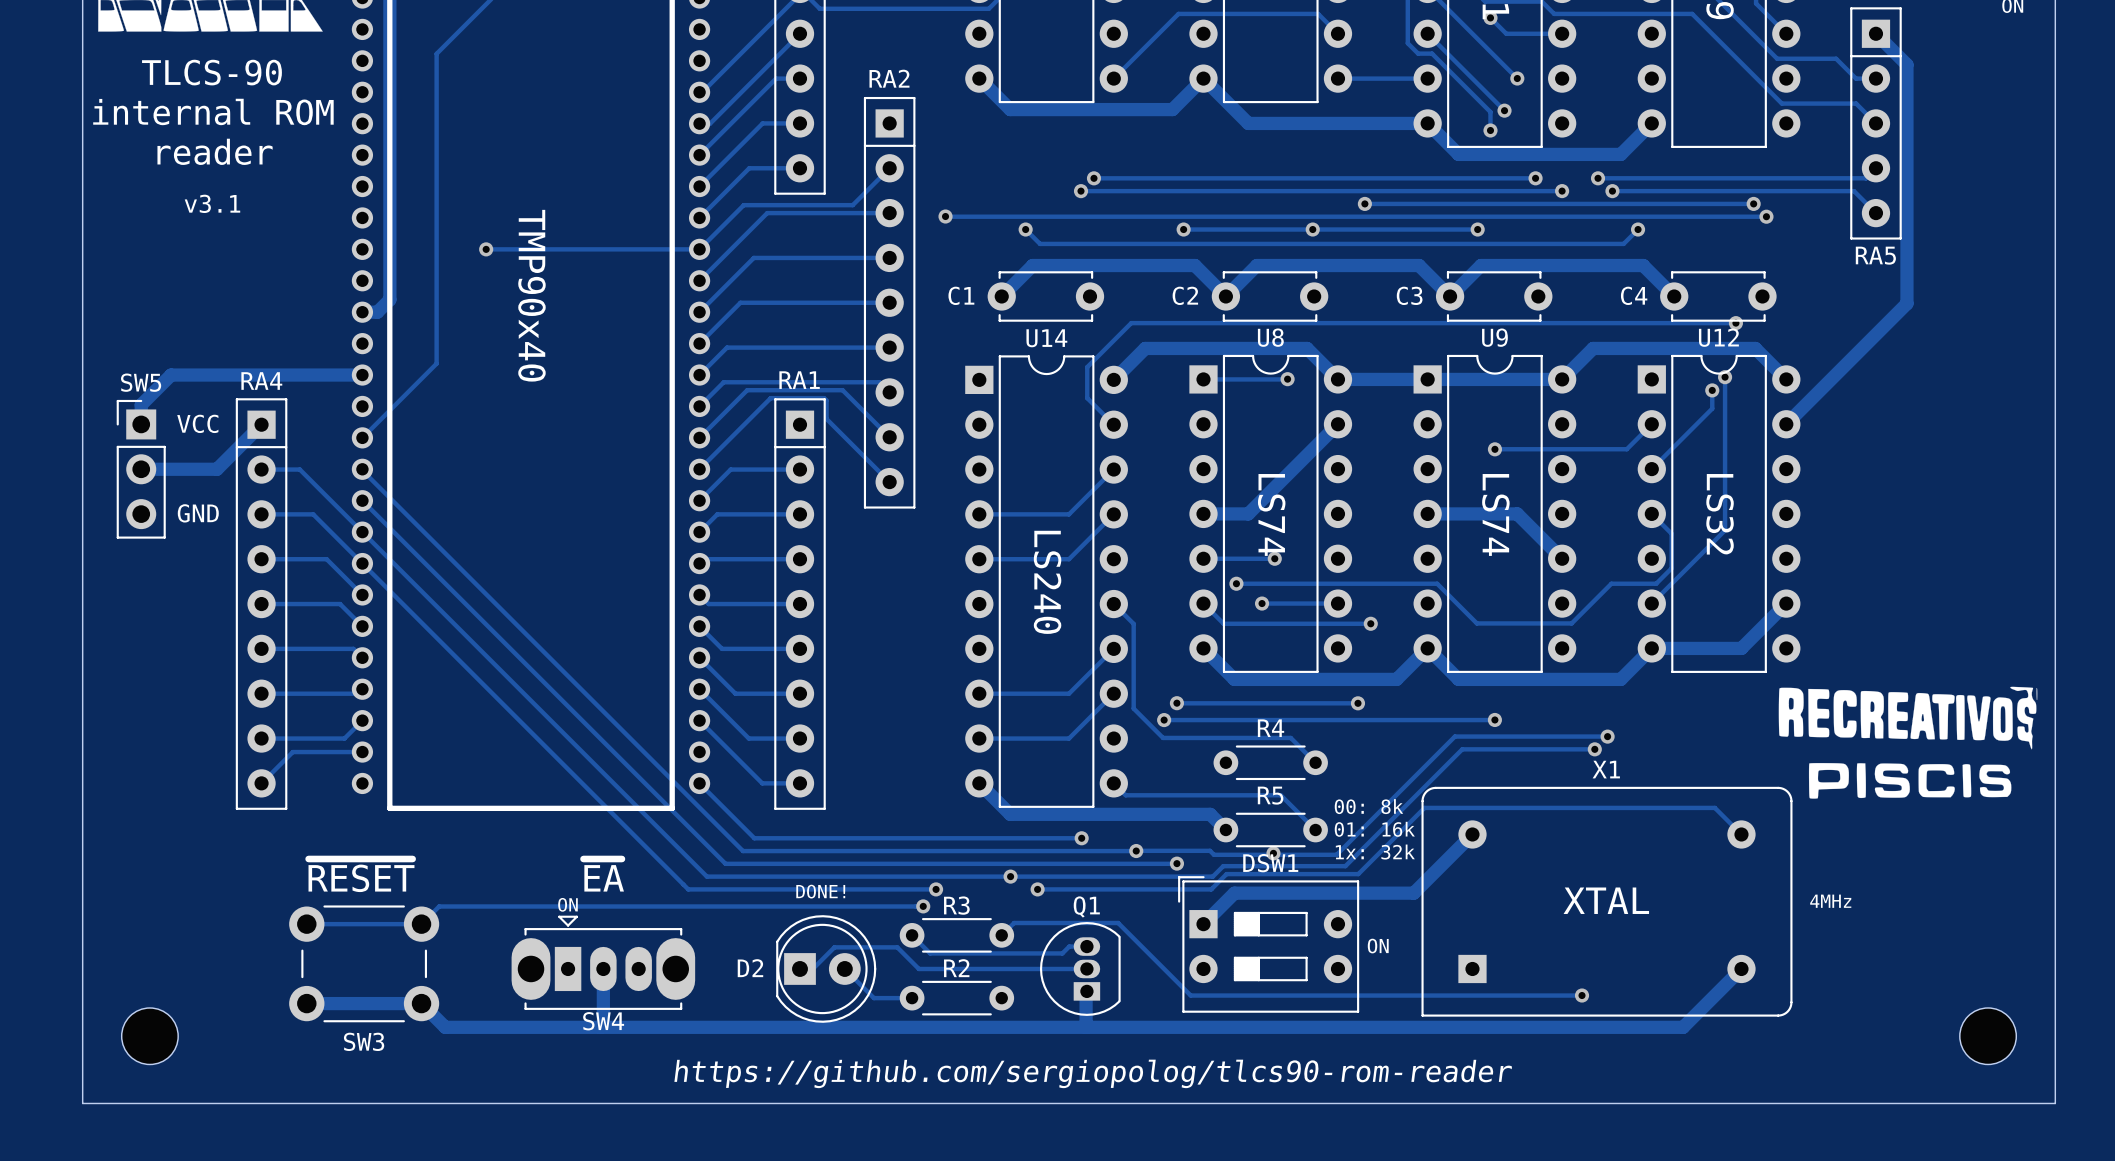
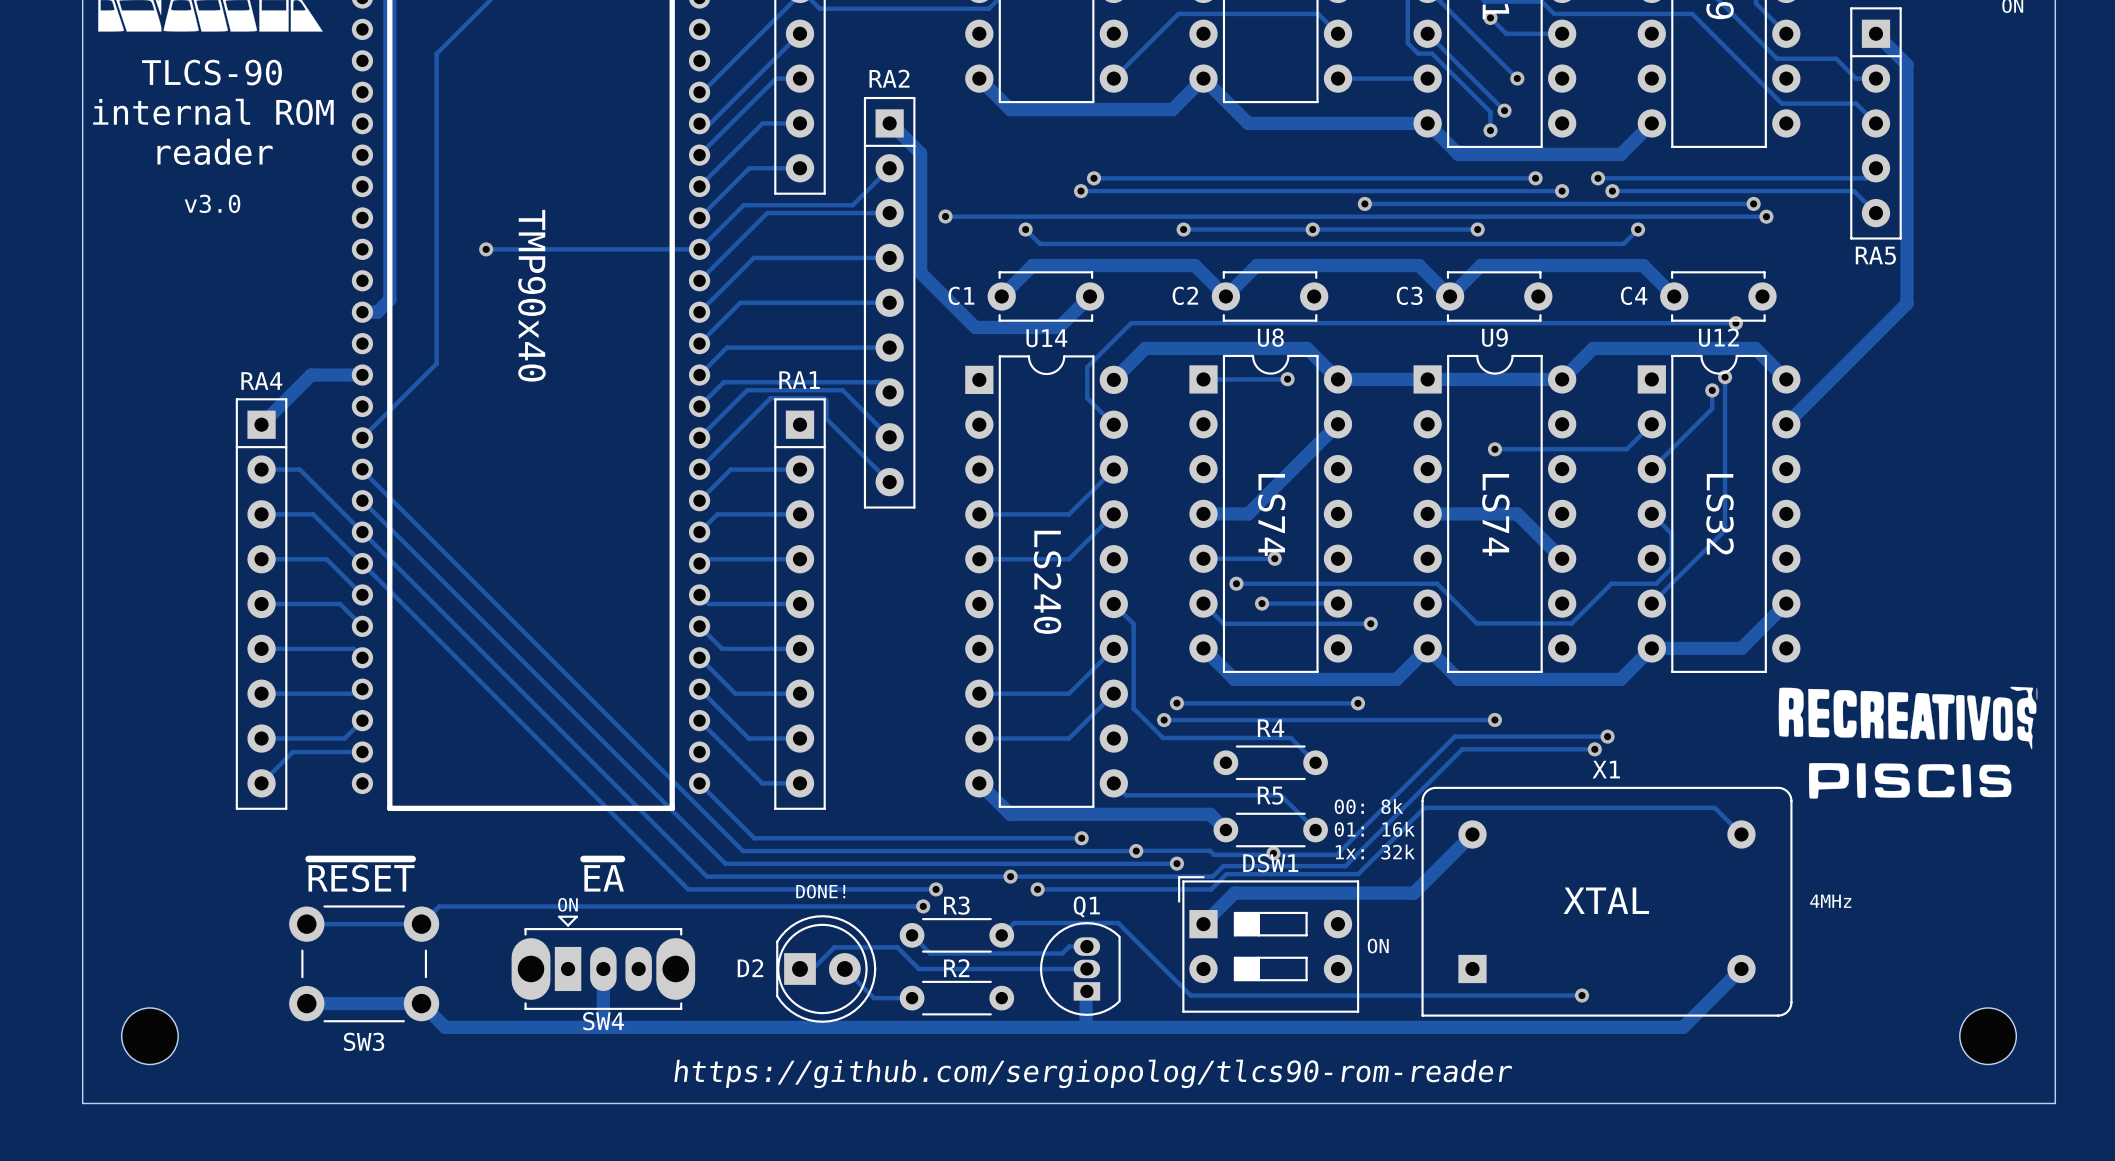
track: none -> (890, 123) (920, 153) (920, 272) (975, 327) (1059, 327) (1090, 296)
text: v3.1 (212, 203) -> v3.0 (212, 203)
track: (311, 375) (171, 375) (141, 404) (141, 424) -> (311, 375) (261, 424)
text: VCC (197, 423) -> none
track: (261, 424) (216, 469) (141, 469) -> none
SW5: (141, 469) -> none
text: GND (198, 513) -> none

